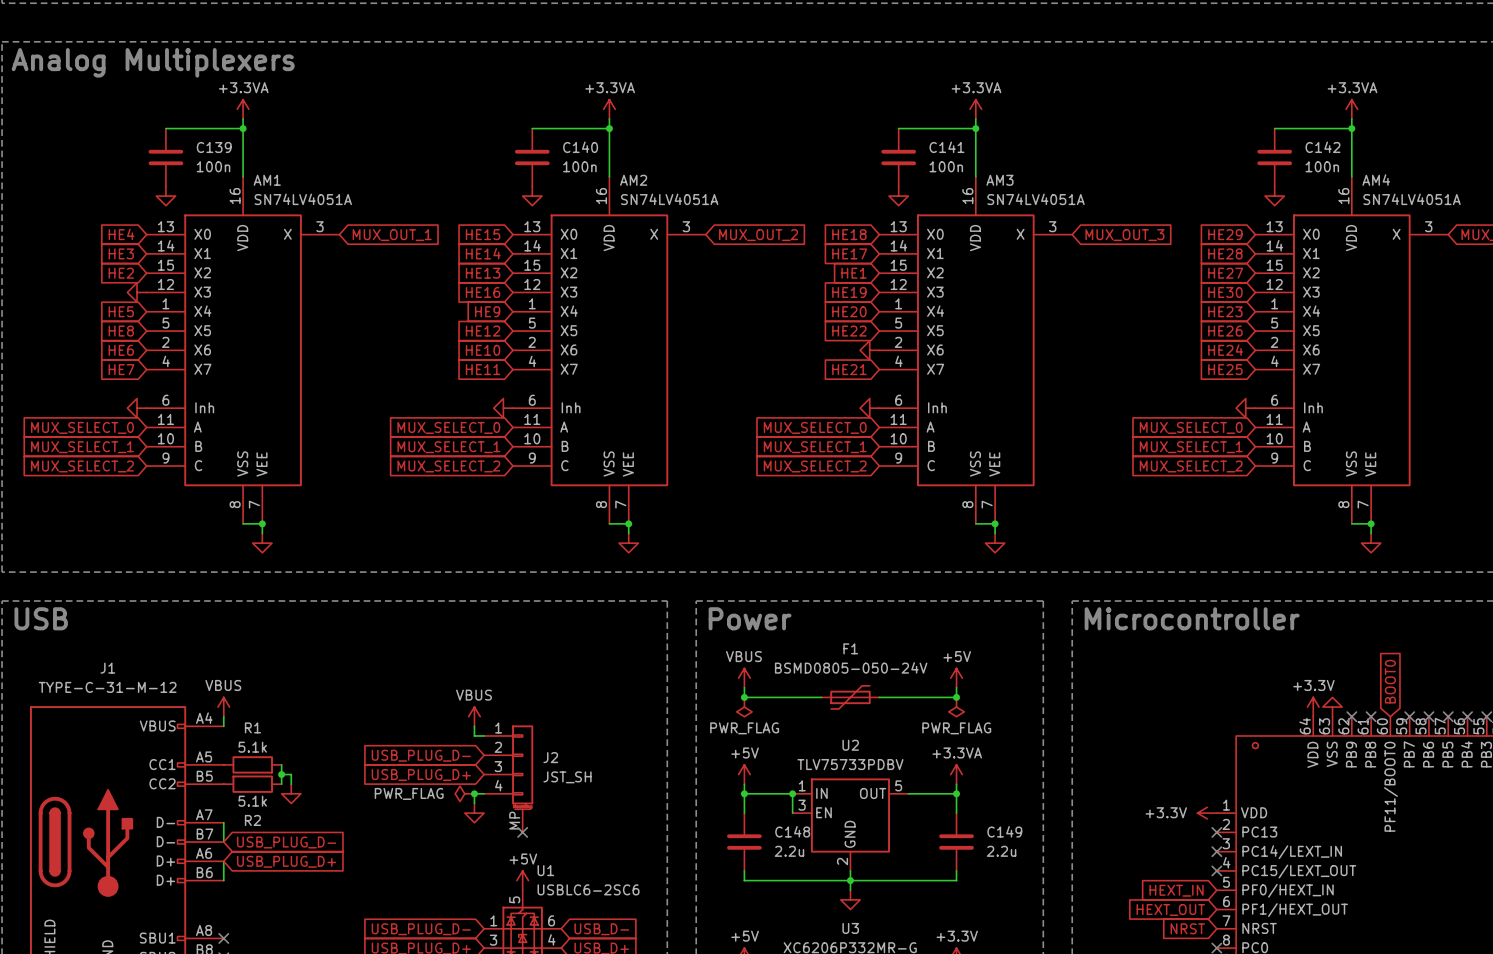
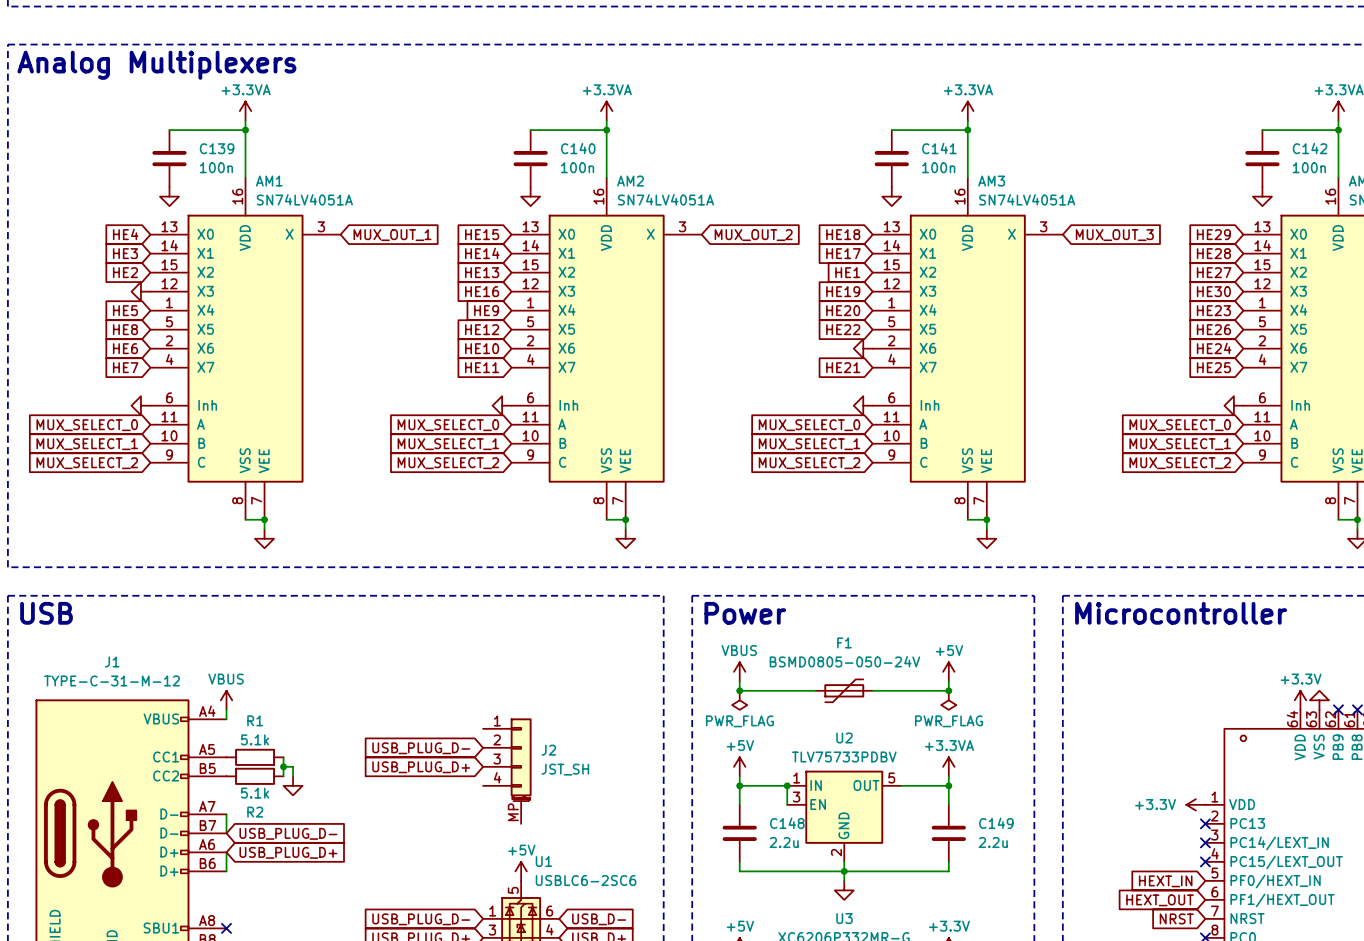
power symbol: VBUS (474, 716) -> none
wire: (474, 726) (474, 735) (484, 735) -> none
power symbol: PWR_FLAG (464, 793) -> none
junction: (474, 793) -> none
wire: (484, 793) (474, 793) (474, 803) -> none
power symbol: (474, 813) -> none
no-connect mark: (522, 832) -> none

